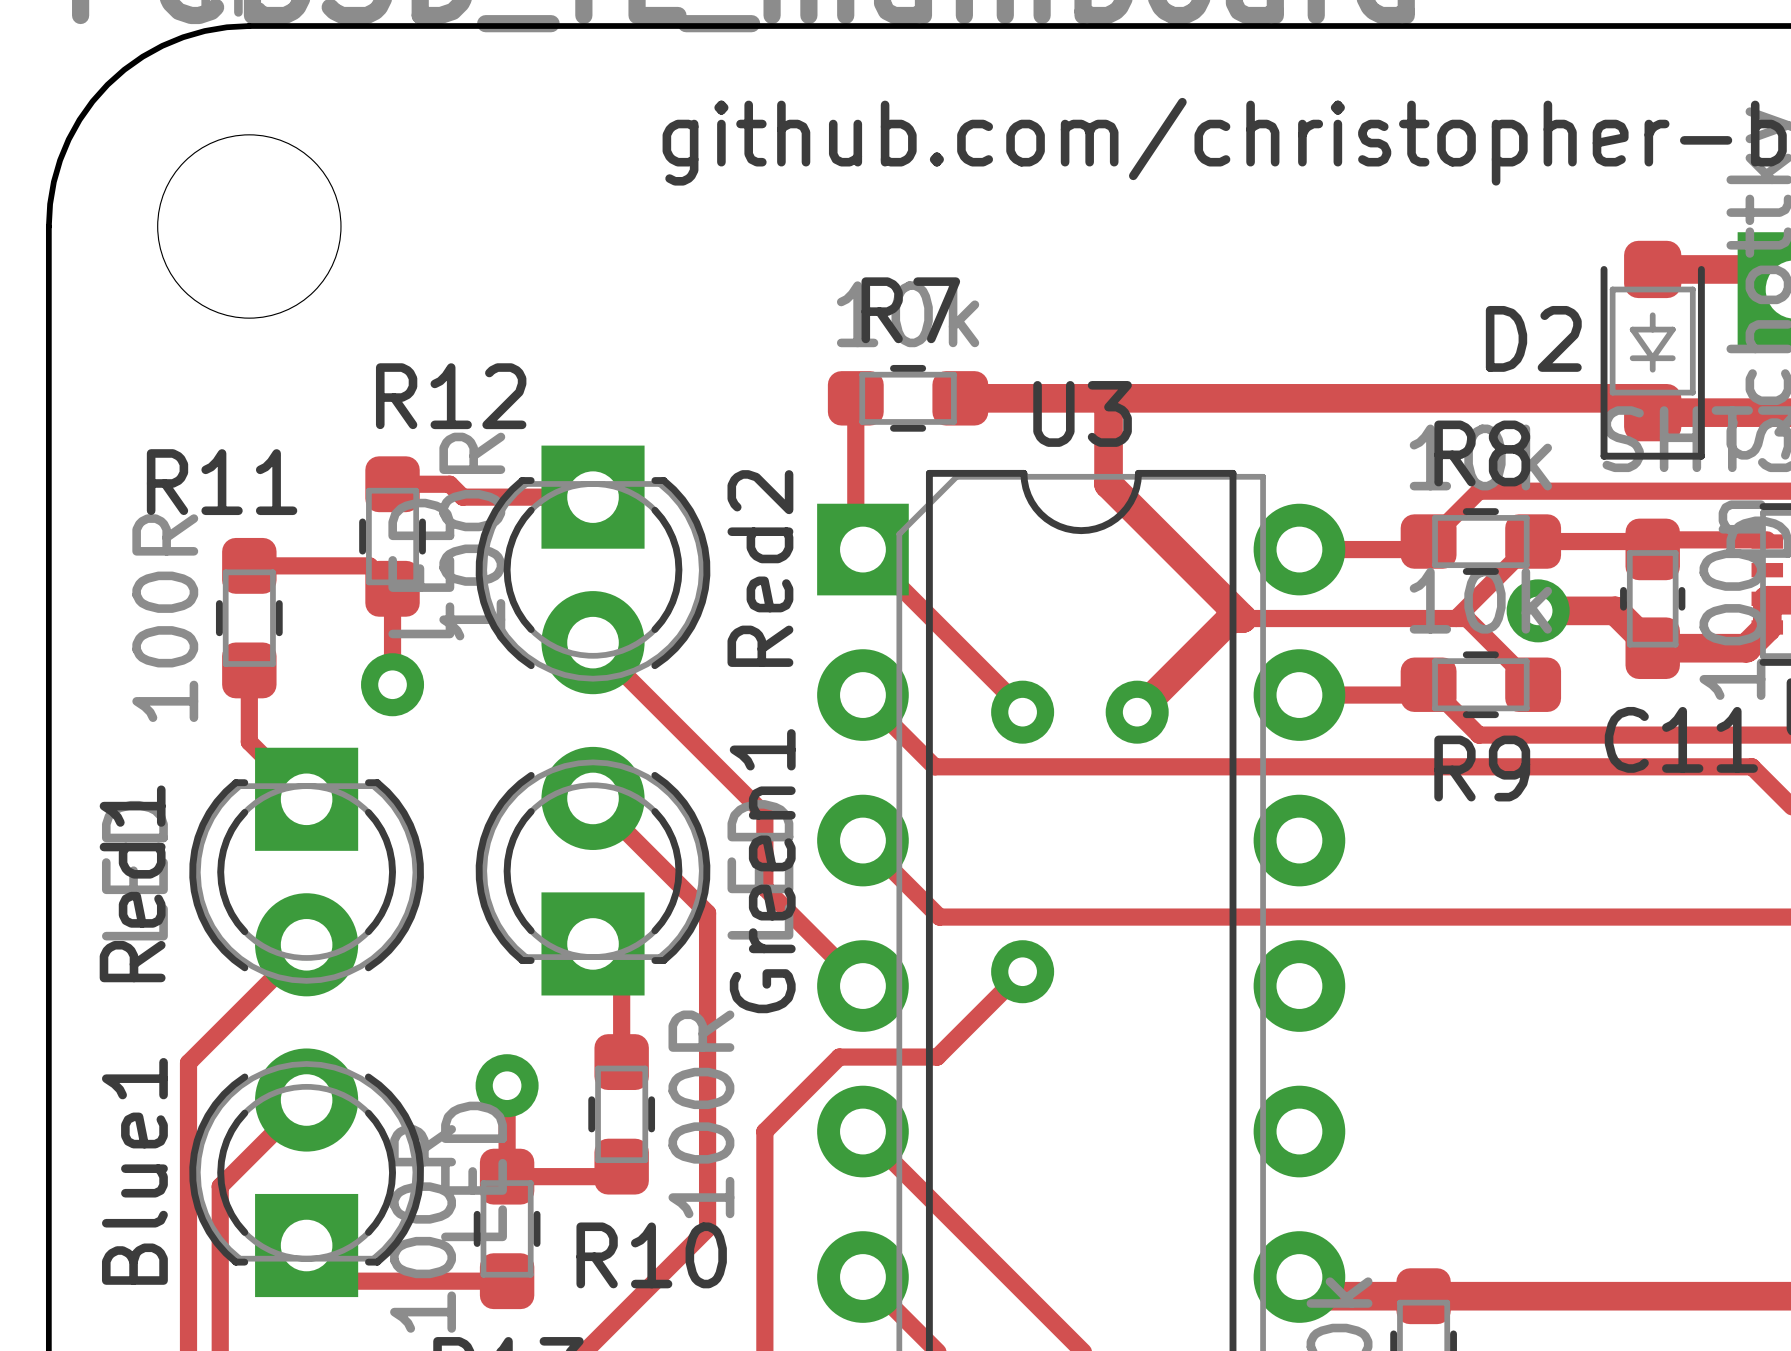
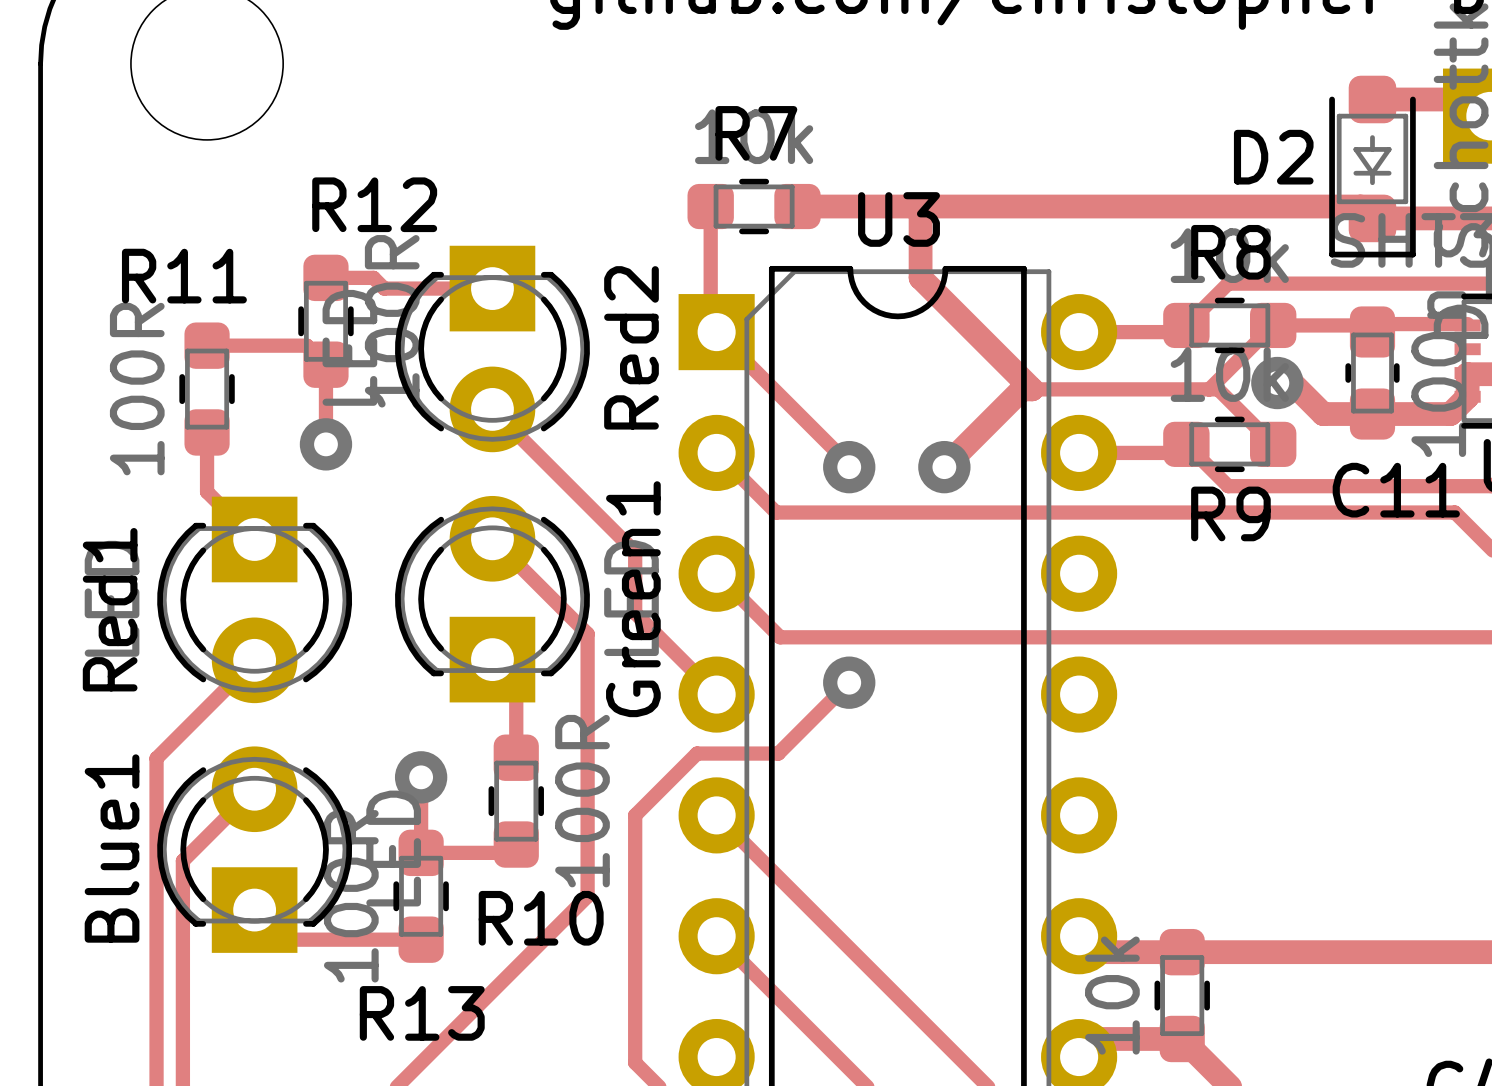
track: (1555, 610) (1615, 610) (1652, 648) -> (1292, 383) (1323, 414) (1372, 414)

